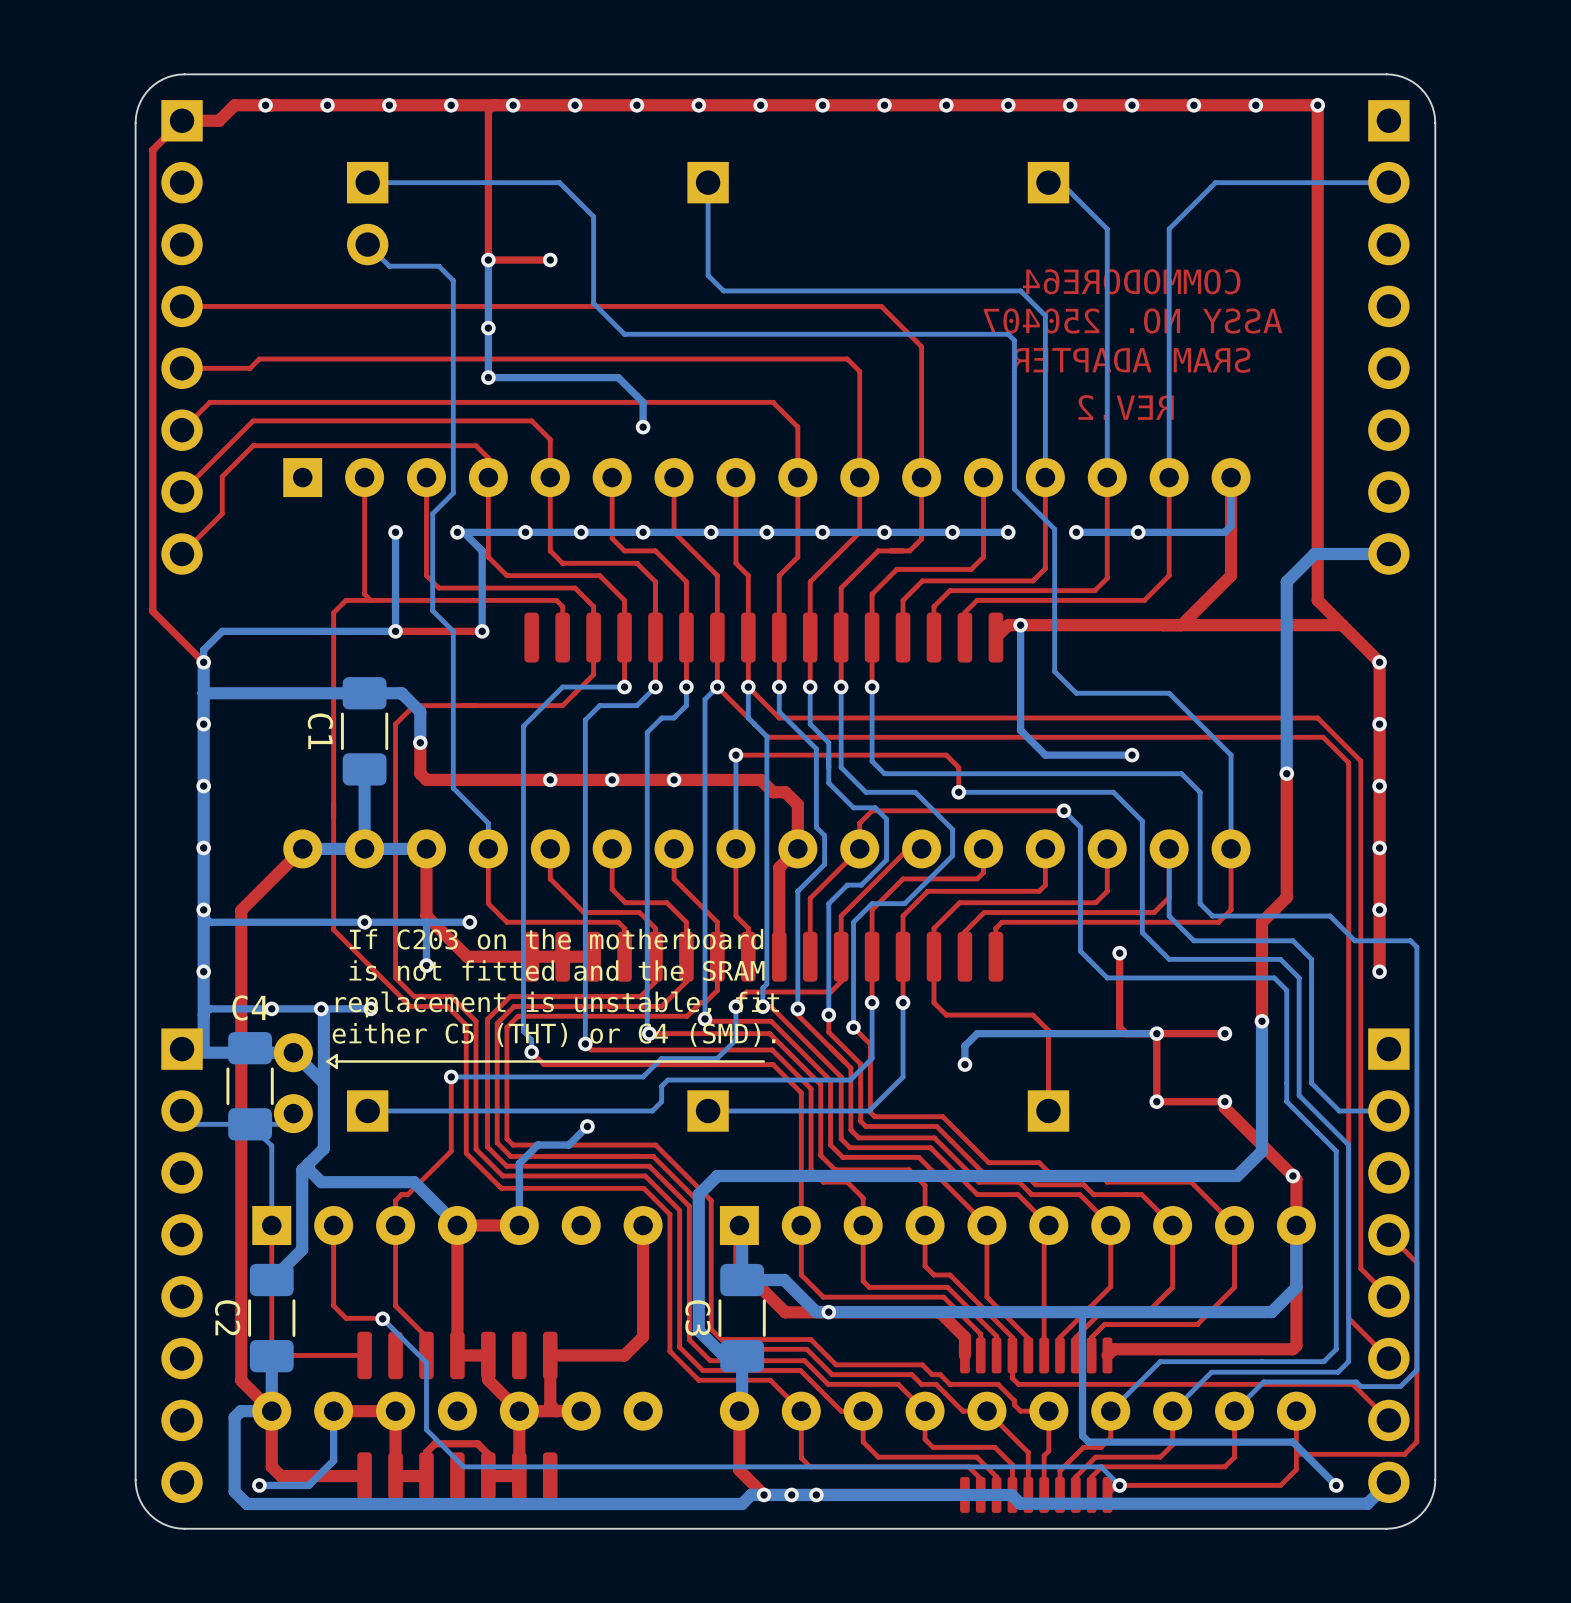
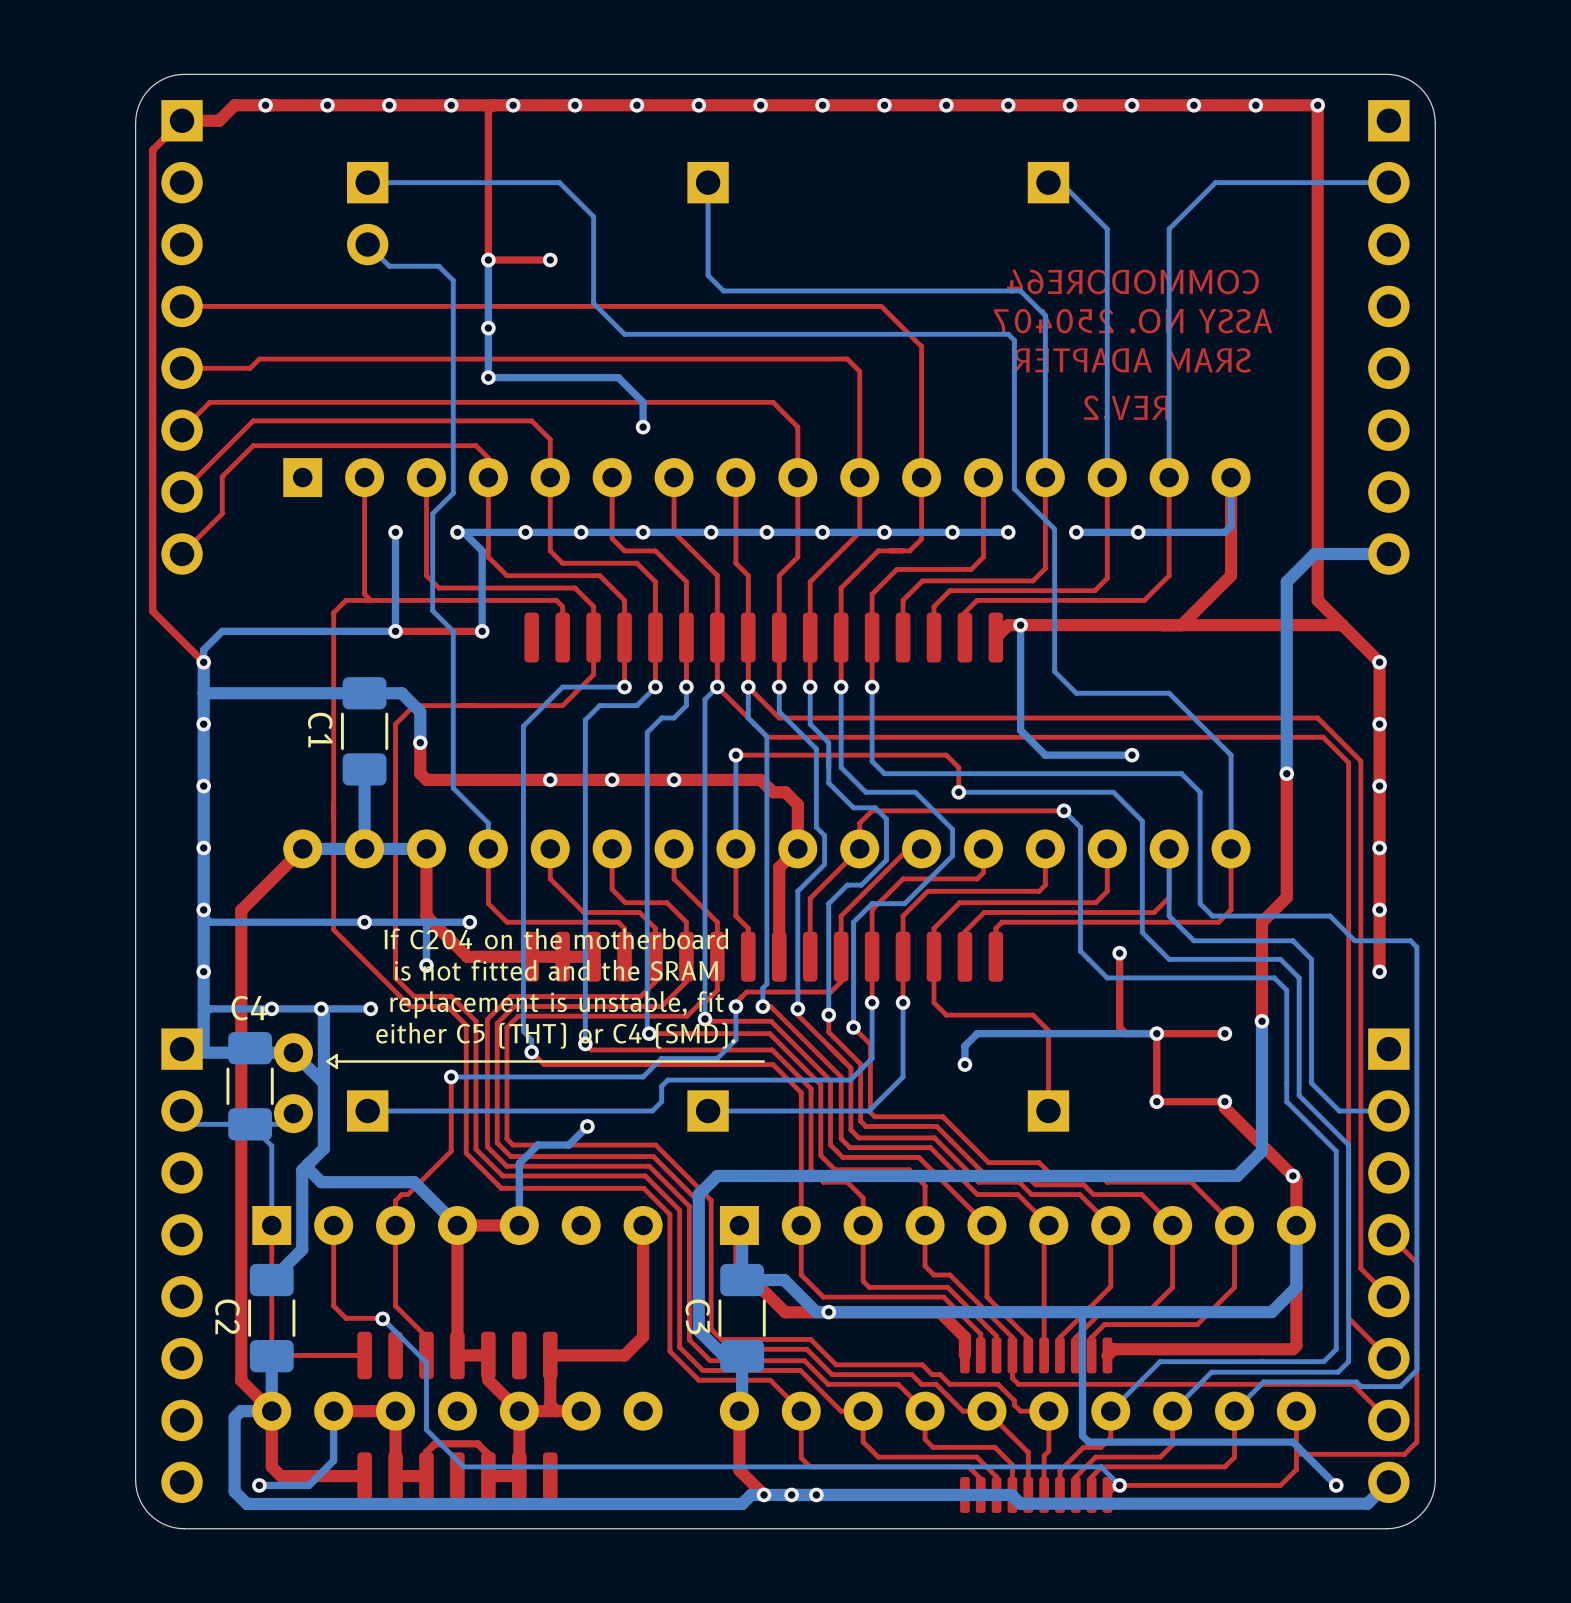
text: If C203 on the motherboard (556, 939) -> If C204 on the motherboard (556, 938)

